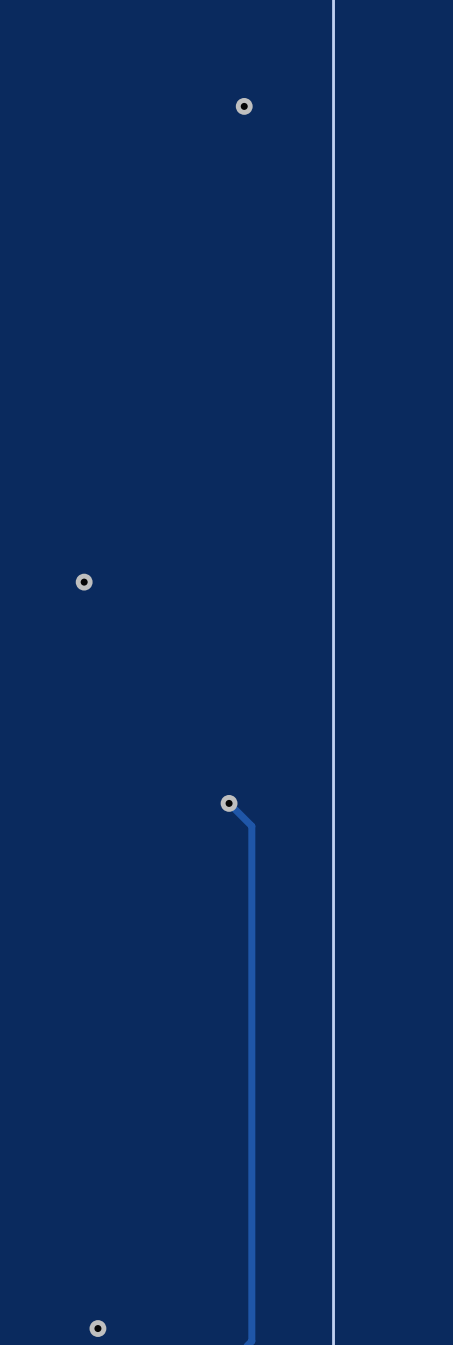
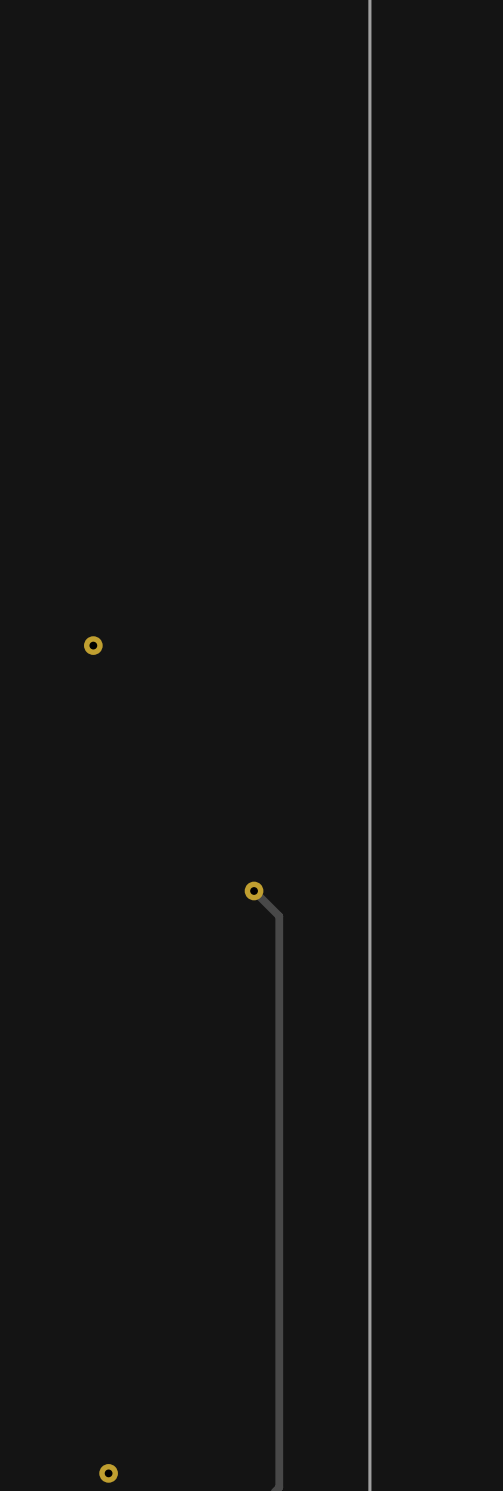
via: (244, 106) -> none

